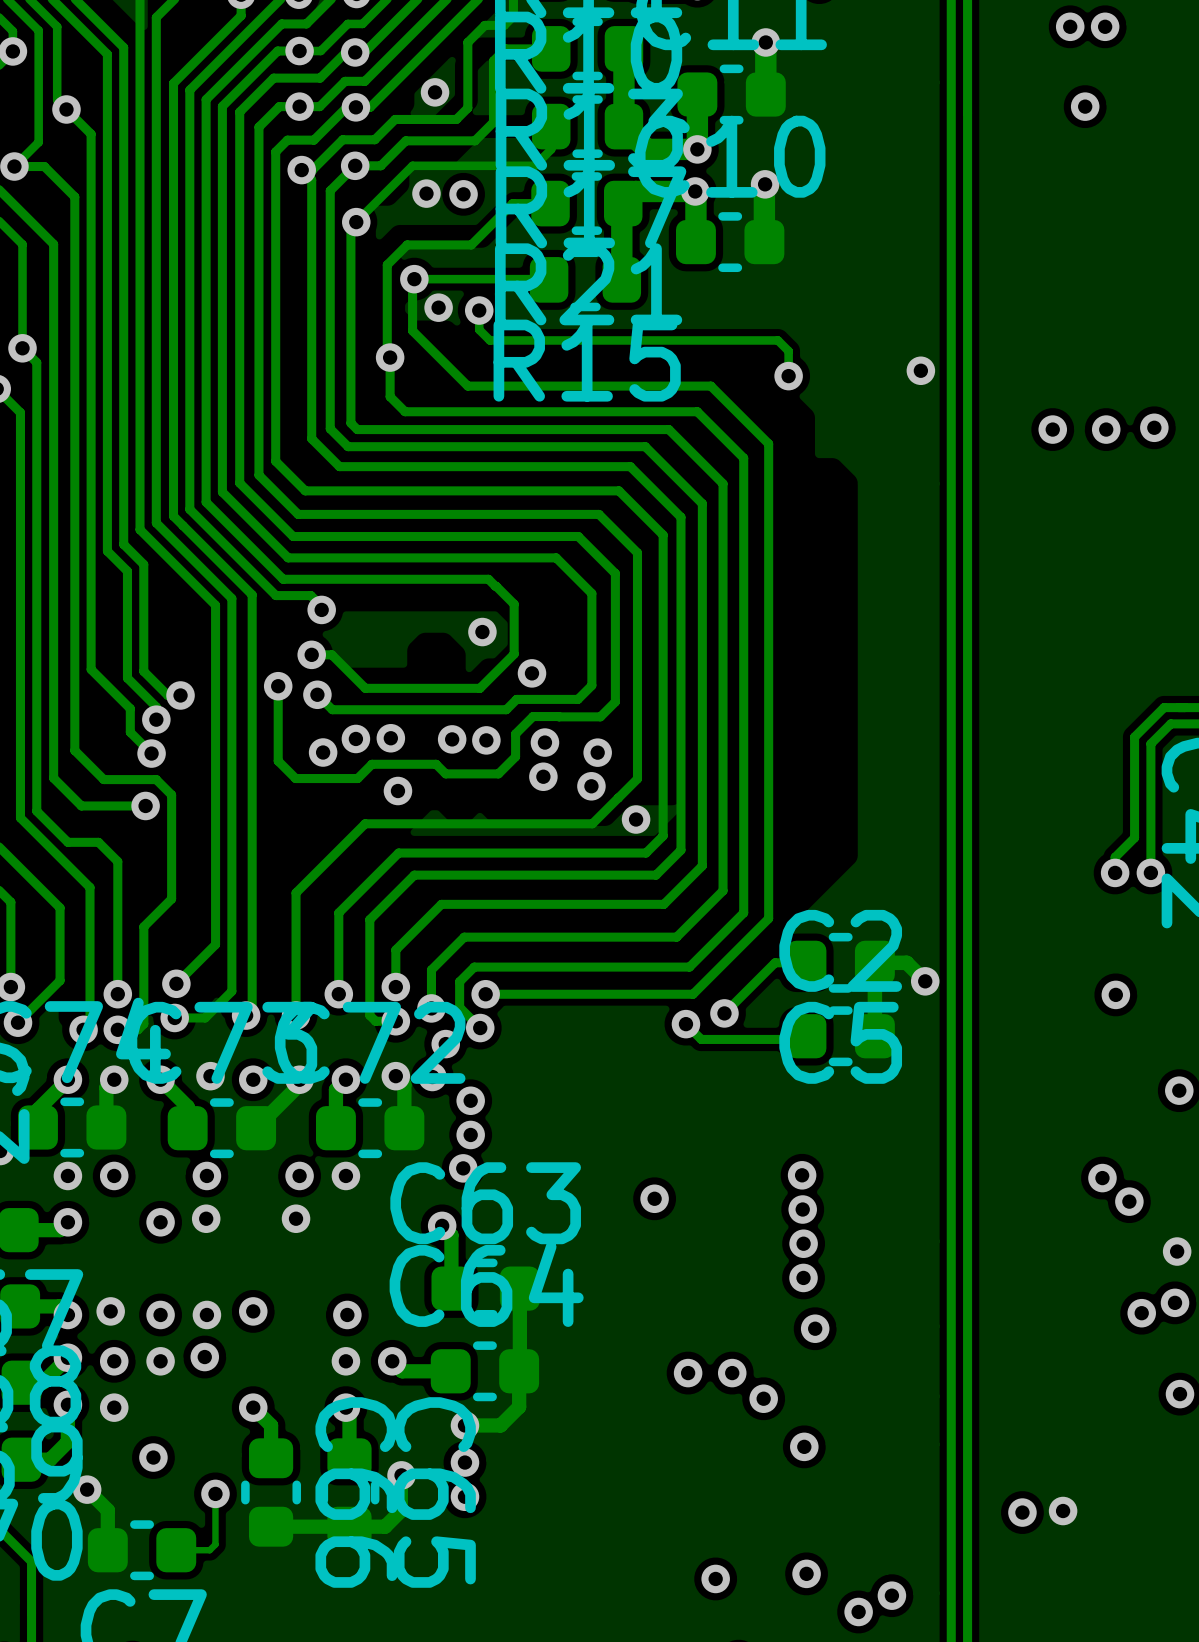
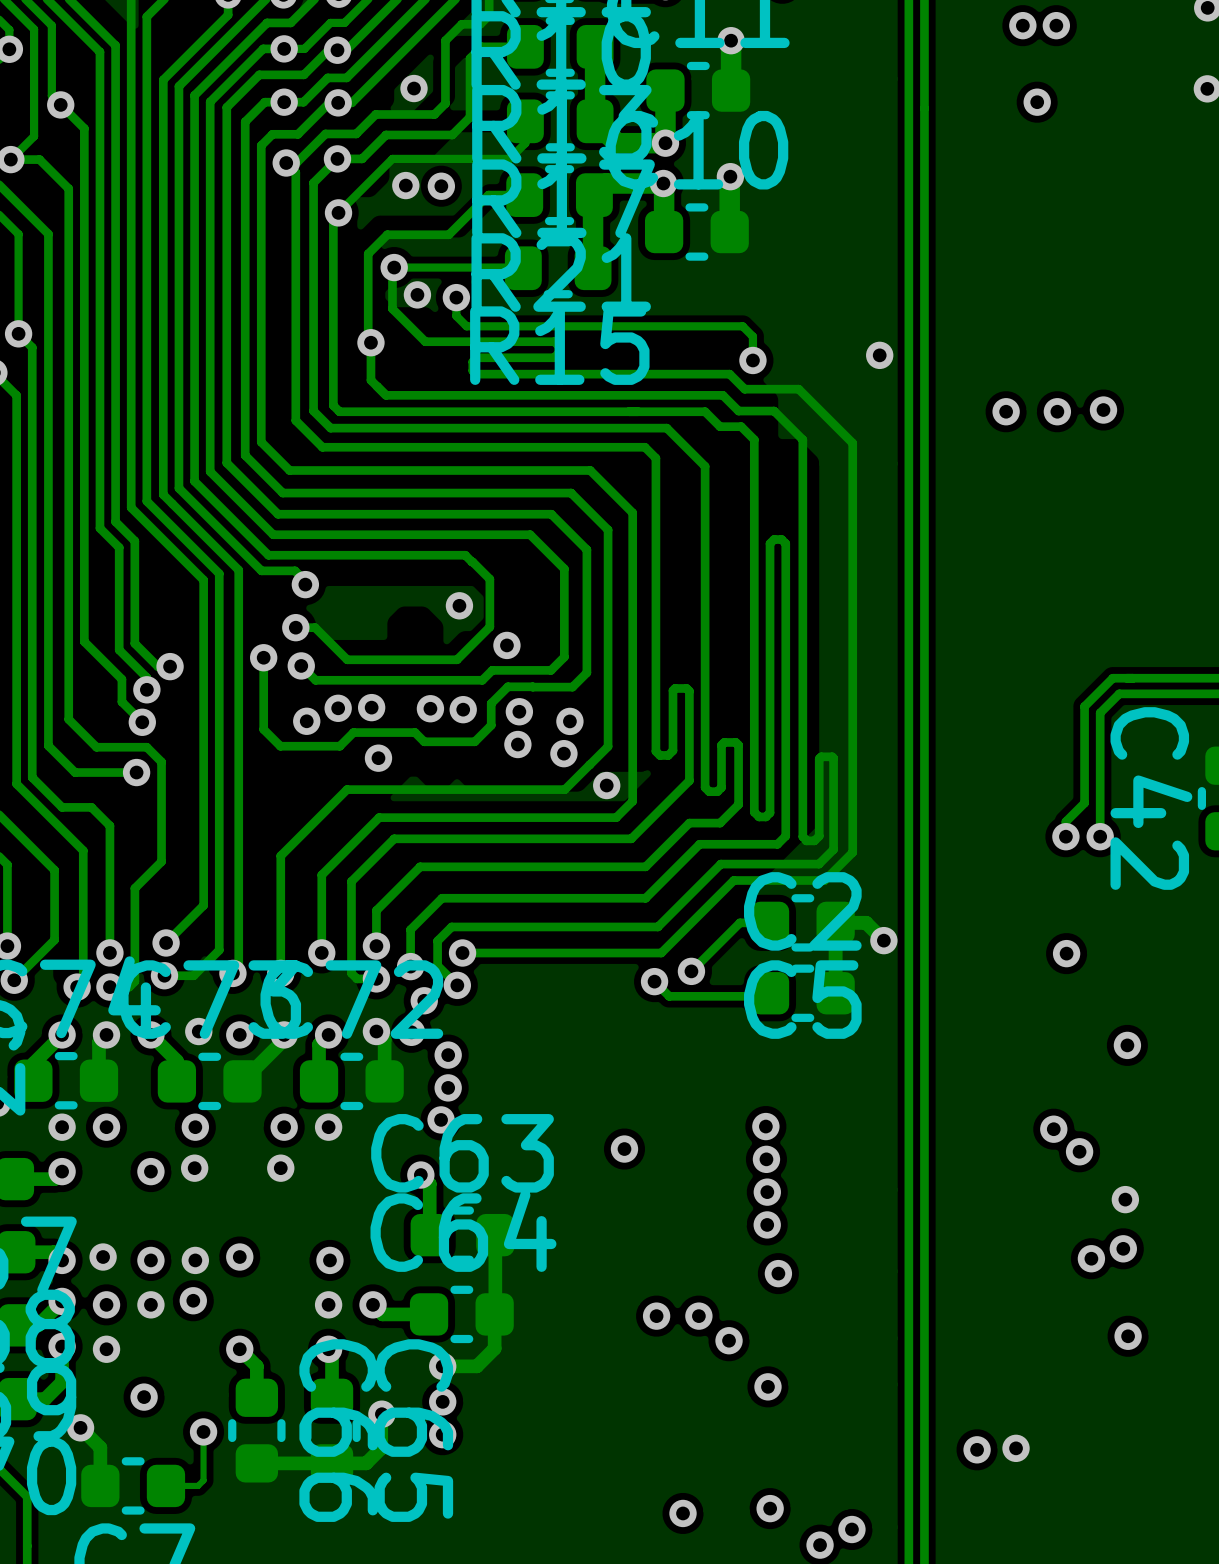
track: (412, 322) (412, 330) (467, 386) (710, 386) (768, 443) (768, 918) -> (392, 308) (425, 341) (554, 341) (558, 346) (558, 352) (554, 357) (476, 357) (472, 361) (472, 370) (476, 374) (729, 374) (744, 389) (798, 389) (852, 443) (852, 852) (824, 880) (733, 880)
track: (405, 411) (697, 411) (743, 458) (743, 912) -> (386, 395) (722, 395) (738, 411) (774, 411) (802, 439) (802, 836) (806, 840)
track: (668, 429) (723, 483) (723, 890) -> (638, 411) (705, 411) (720, 426) (741, 426) (754, 439) (754, 812) (759, 816) (765, 816) (770, 812) (770, 543) (774, 539) (781, 539) (785, 543) (785, 836) (777, 844) (699, 844) (690, 853)
track: (645, 446) (702, 503) (702, 865) (663, 904) -> (615, 428) (666, 428) (705, 466) (705, 787) (709, 791) (717, 791) (721, 787) (721, 745) (724, 742) (735, 742) (738, 745) (738, 804) (720, 823) (689, 823) (645, 866) (633, 866)
track: (630, 466) (680, 517) (680, 850) (656, 875) -> (601, 447) (644, 447) (655, 458) (655, 751) (660, 755) (668, 755) (672, 750) (672, 690) (675, 688) (686, 688) (689, 691) (689, 780) (631, 838) (625, 838)
track: none -> (806, 840) (814, 840) (819, 836) (819, 758) (821, 756) (832, 756) (833, 849) (819, 864) (720, 864) (709, 875)

